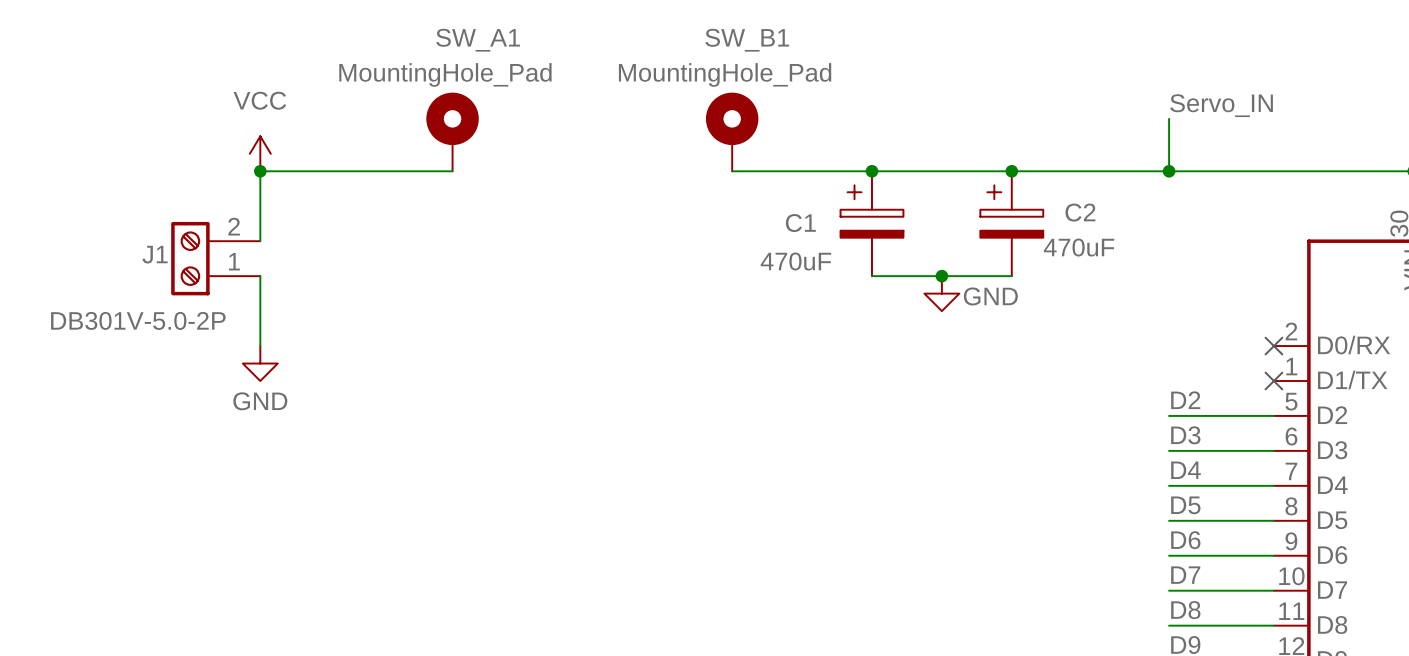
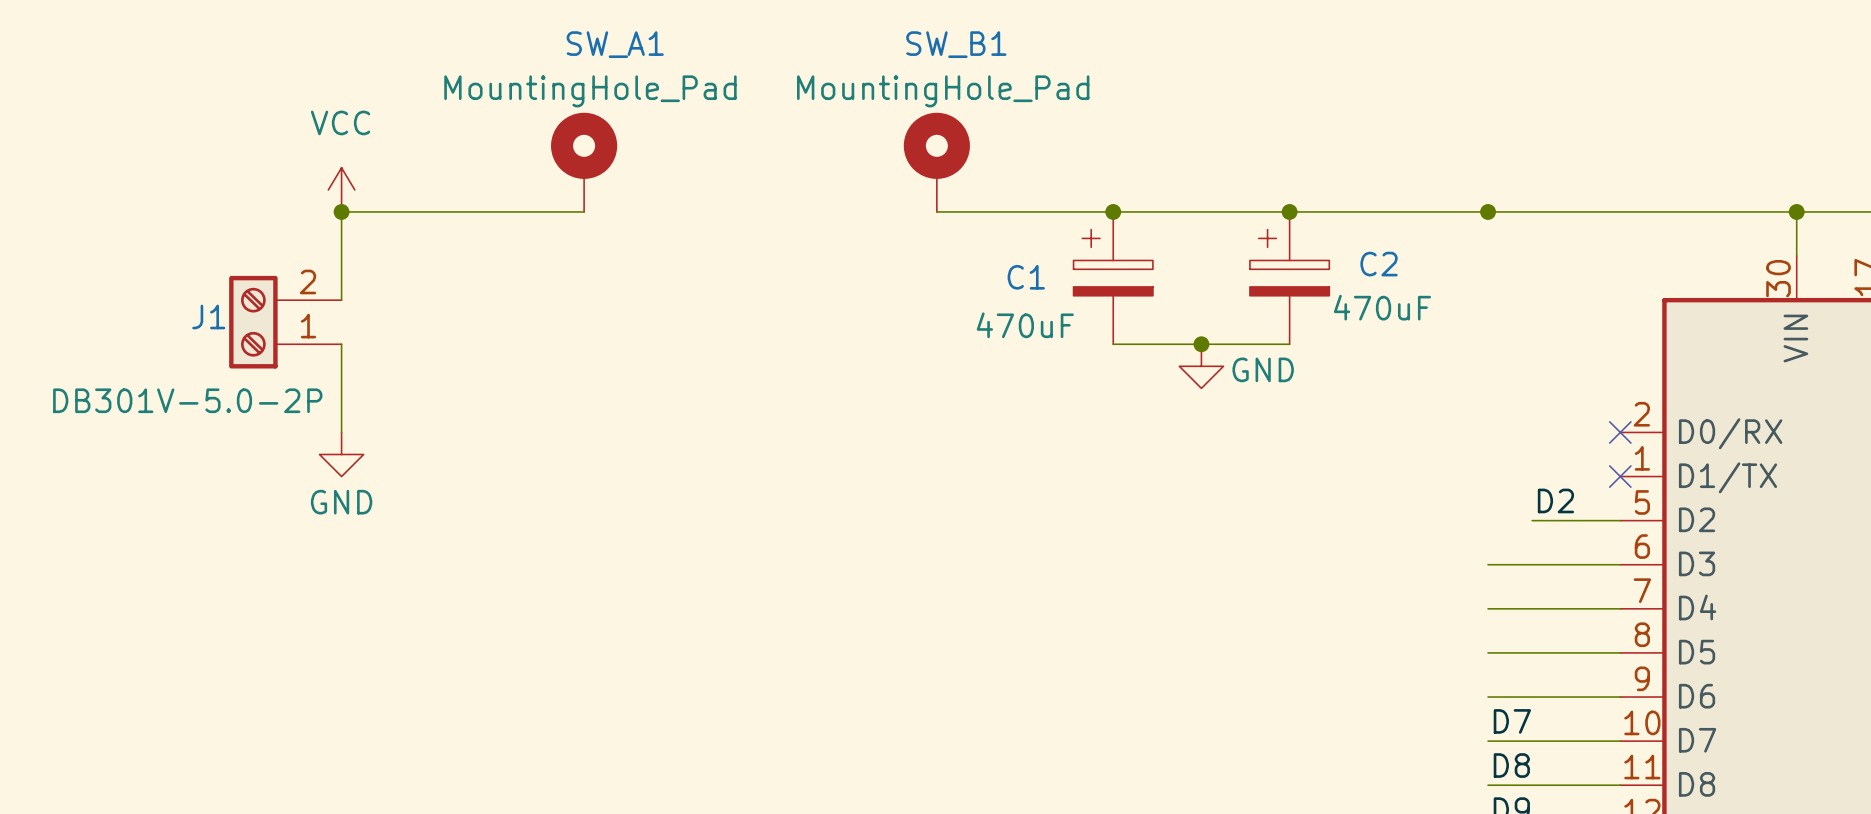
label: Servo_IN (1221, 105) -> none
wire: (1169, 118) (1169, 171) -> none
label position: D2 (1185, 400) -> D2 (1555, 500)
wire: (1169, 415) (1204, 415) -> none
label: D3 (1185, 435) -> none
label: D4 (1185, 470) -> none
label: D5 (1185, 505) -> none
label: D6 (1185, 540) -> none

